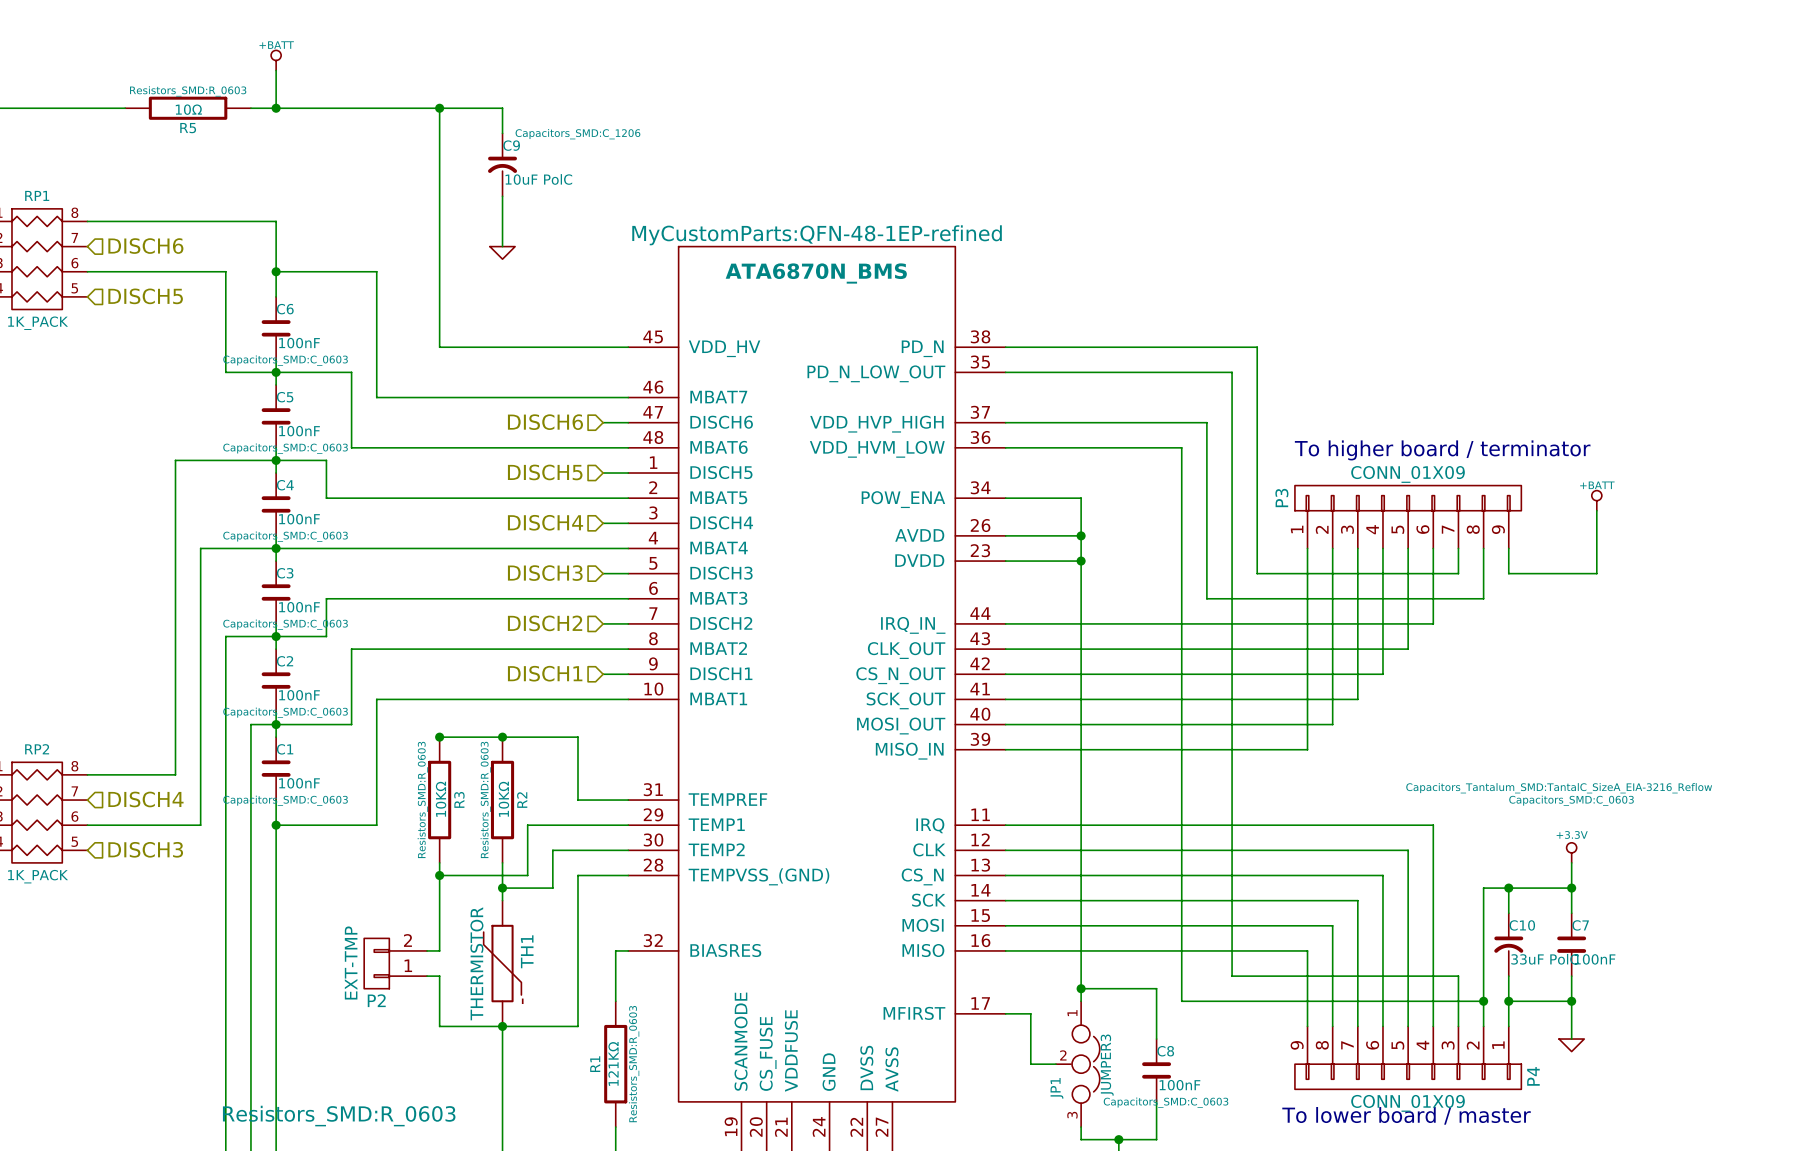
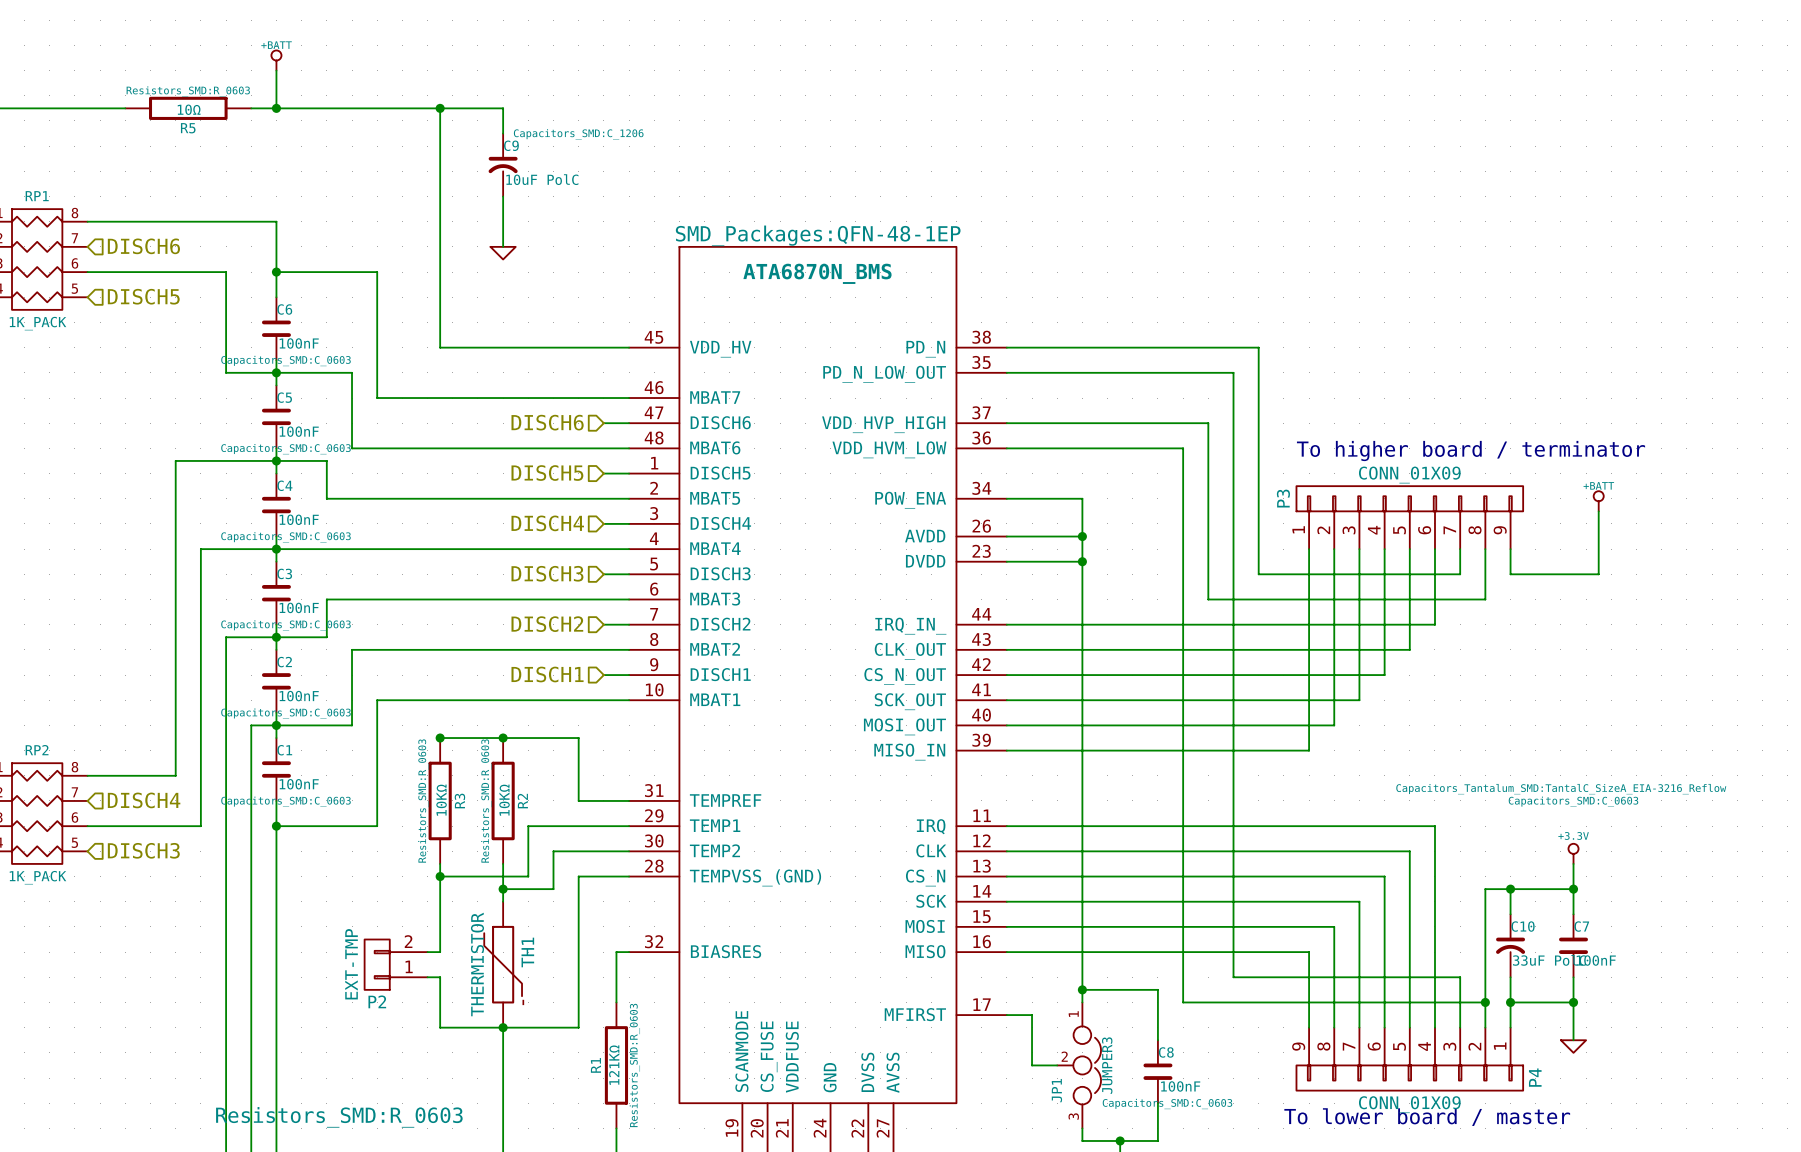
part text: MyCustomParts:QFN-48-1EP-refined (817, 235) -> SMD_Packages:QFN-48-1EP (818, 235)

